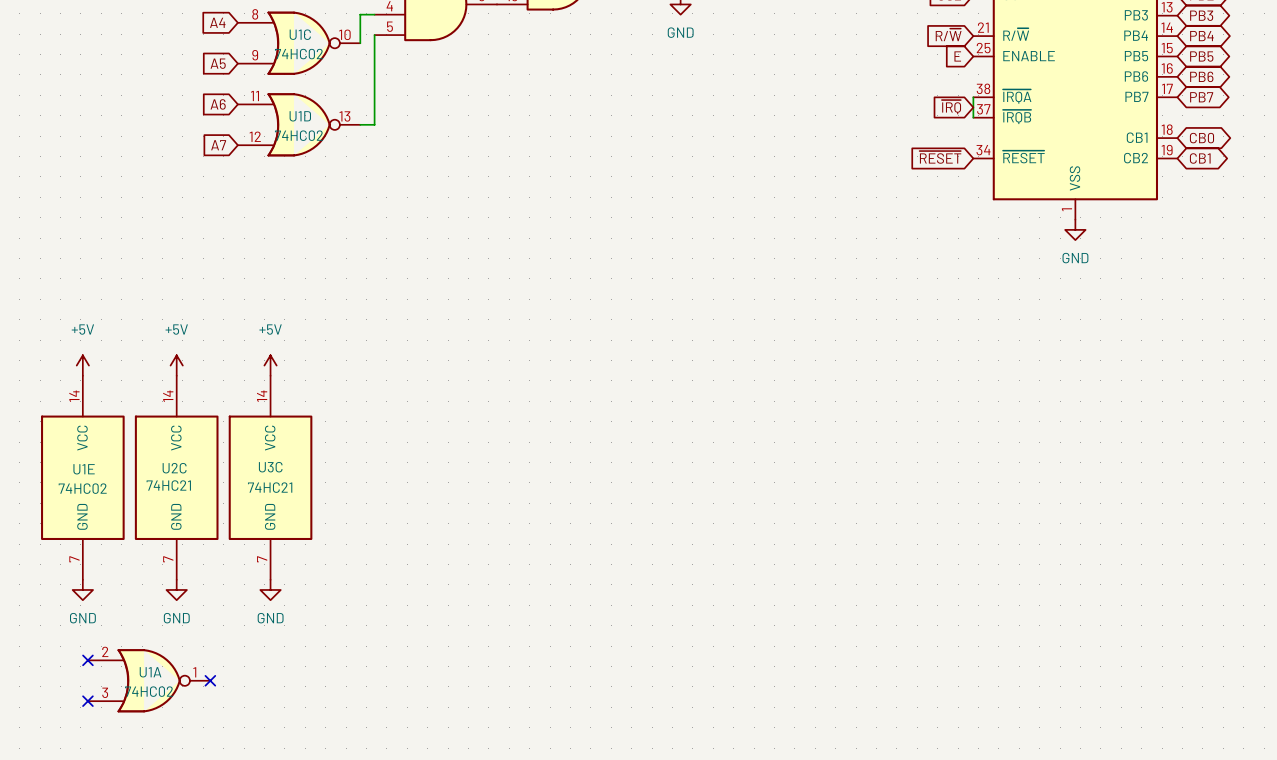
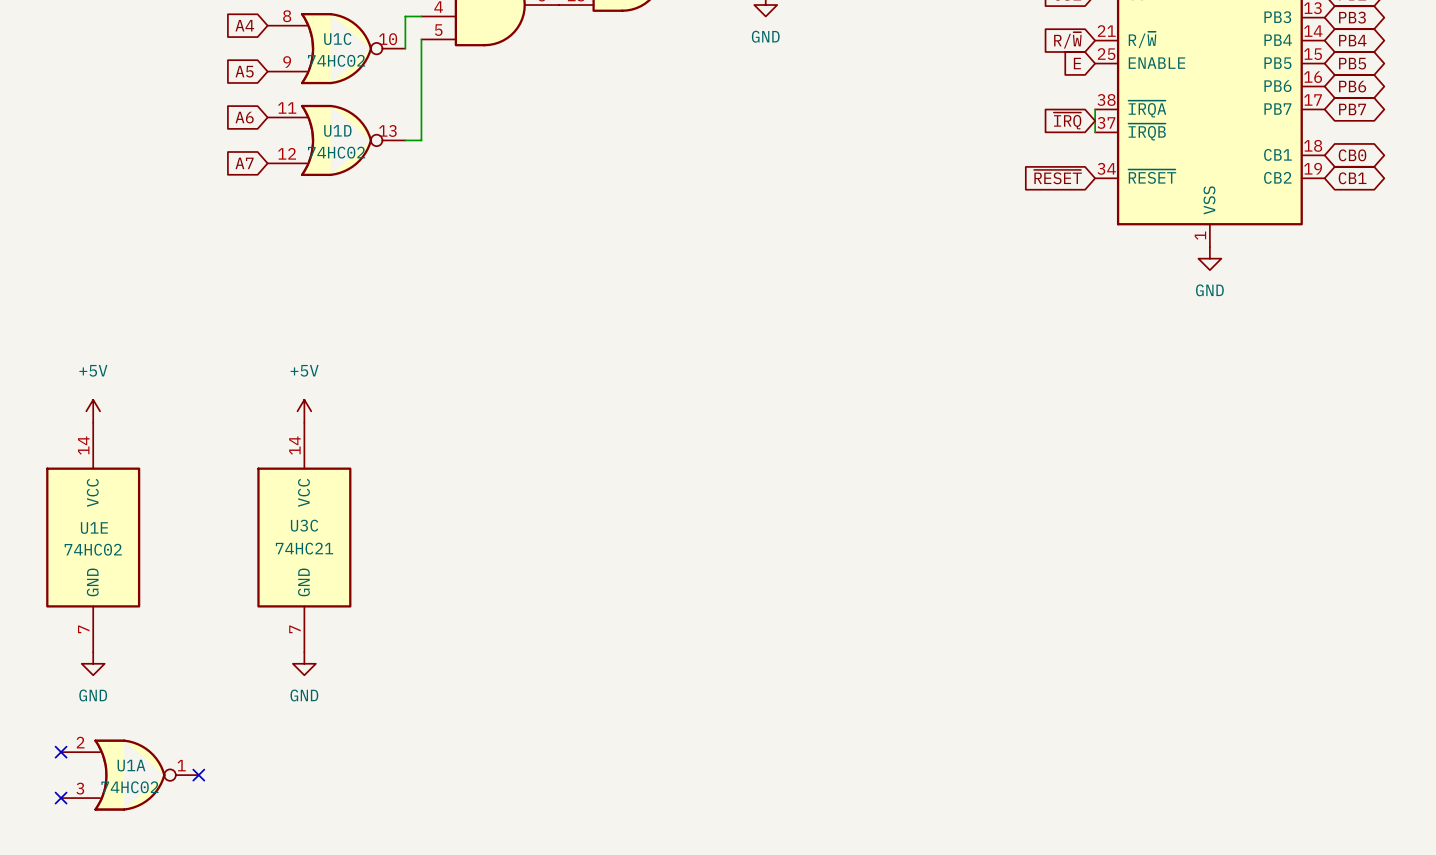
power symbol: +5V (176, 365) -> none
U2C: 74HC21 (176, 477) -> none
power symbol: GND (176, 589) -> none
no-connect mark: (87, 660) -> none
no-connect mark: none -> (61, 752)
U1A position: (149, 680) -> (129, 775)
no-connect mark position: (210, 680) -> (198, 775)
no-connect mark: (87, 701) -> none
no-connect mark: none -> (61, 798)

